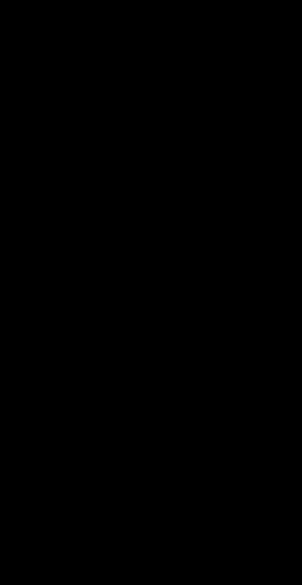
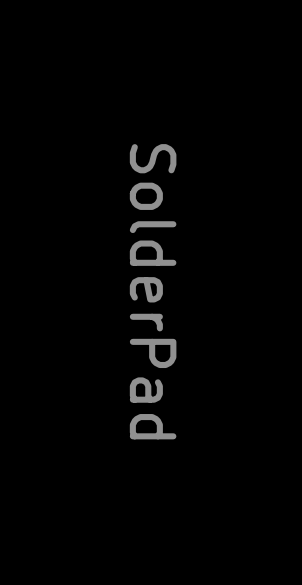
part: none -> SolderPad (153, 291)

